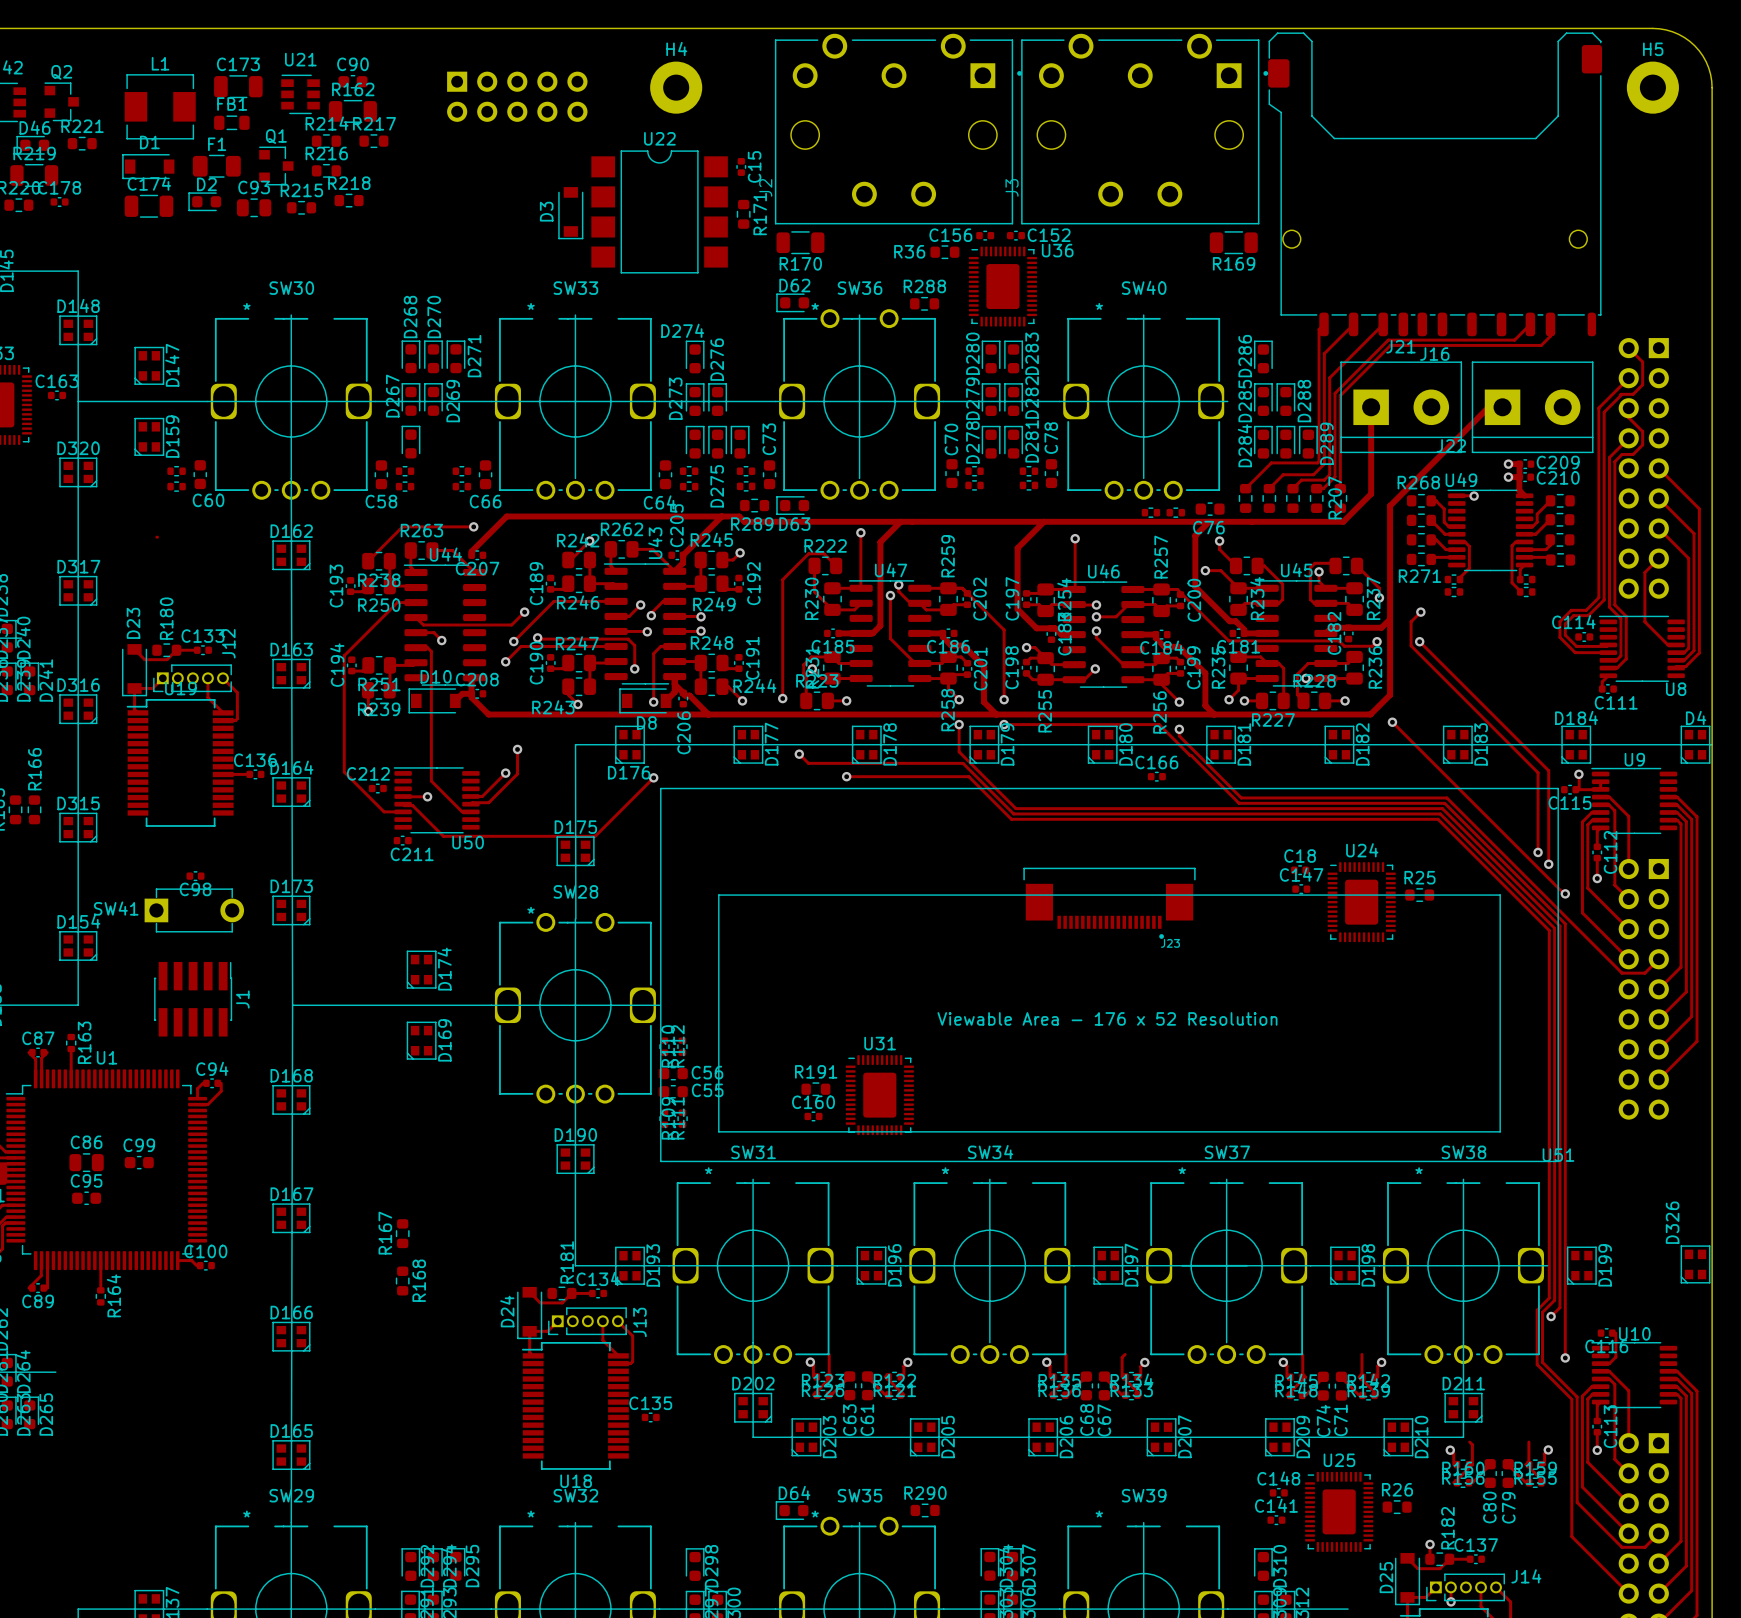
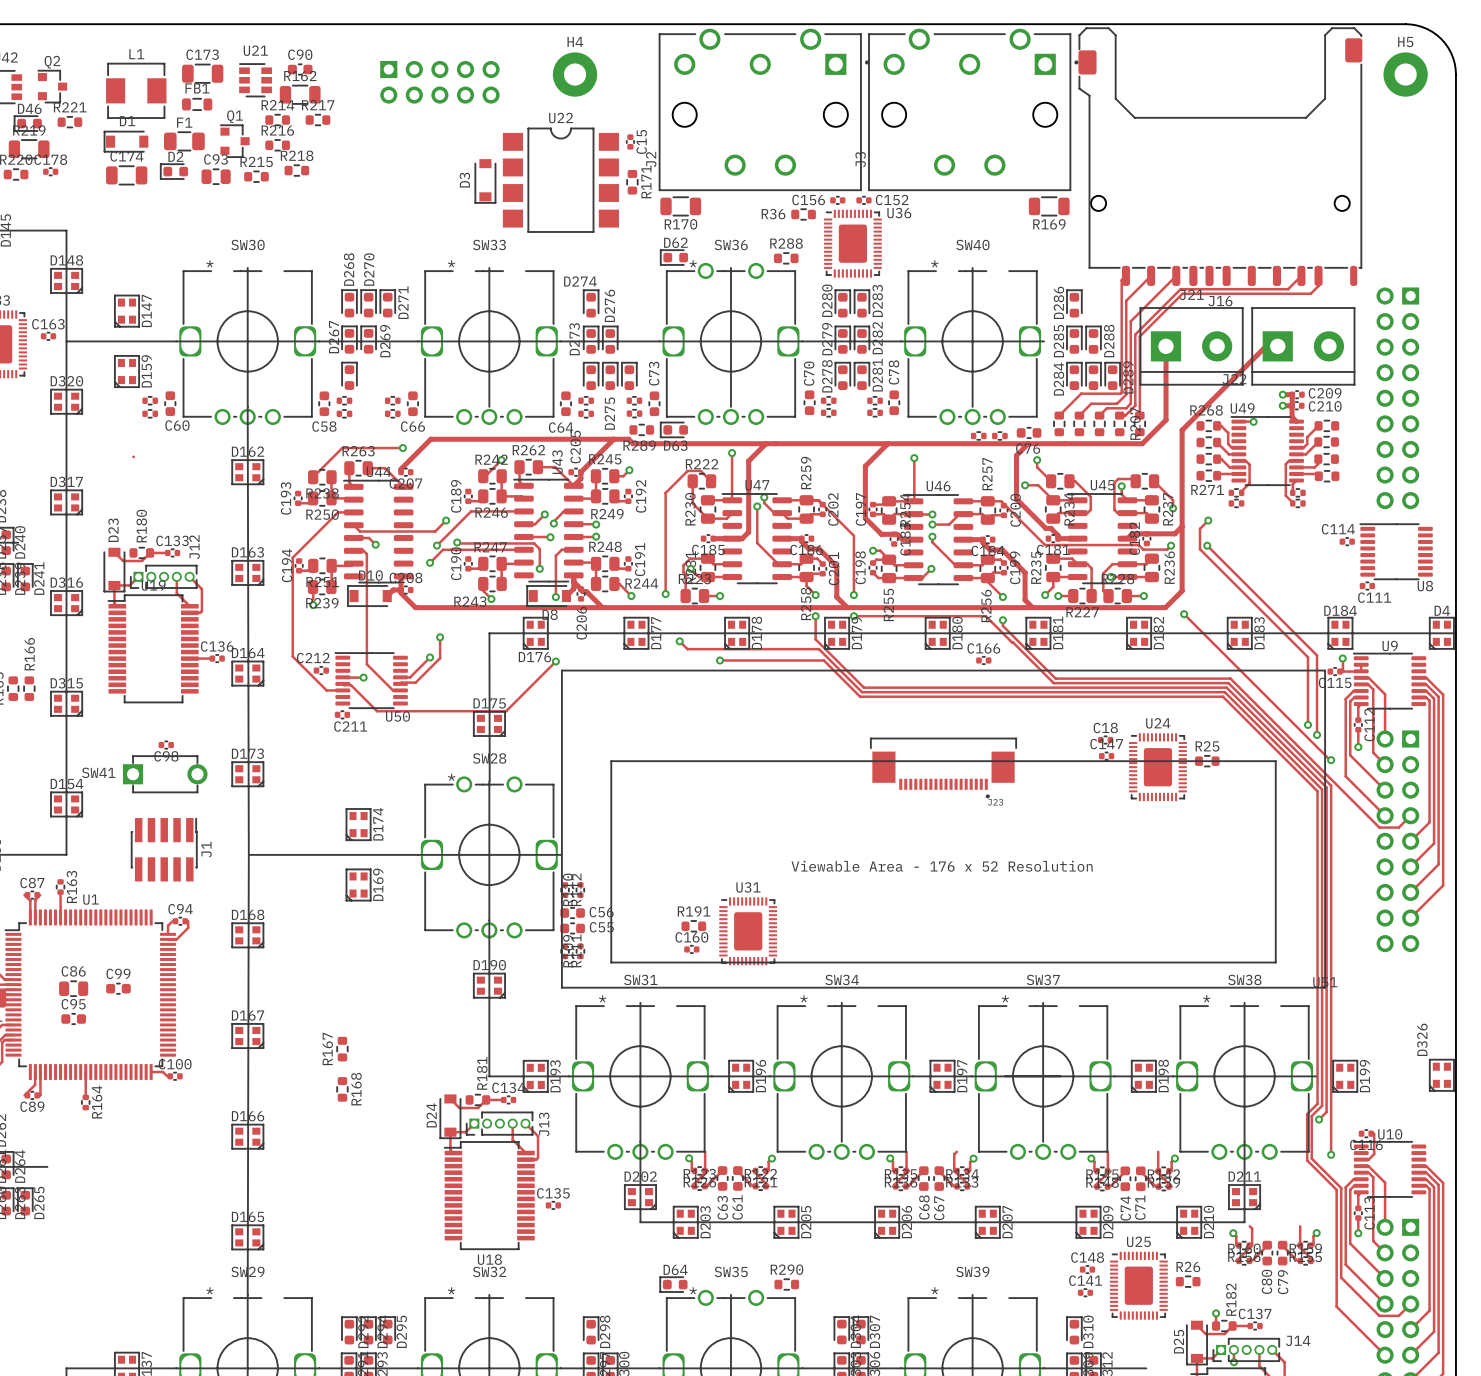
track: (1628, 348) (1642, 362) (1642, 384) (1633, 394) (1620, 394) (1604, 412) (1604, 599) (1588, 615) (1573, 615) (1565, 623) (1565, 635) (1576, 646) (1608, 644) -> none
track: (1628, 378) (1598, 408) (1598, 597) (1586, 610) (1571, 610) (1559, 621) (1559, 637) (1575, 652) (1608, 652) -> none
track: (1628, 408) (1628, 417) (1642, 431) (1642, 444) (1633, 454) (1622, 454) (1614, 461) (1614, 604) (1626, 616) (1626, 658) (1617, 668) (1608, 668) -> none
track: (1628, 438) (1609, 457) (1609, 607) (1620, 618) (1620, 655) (1616, 660) (1608, 660) -> none
track: (1658, 468) (1699, 508) (1699, 652) (1685, 666) (1676, 668) -> none
track: (1658, 498) (1694, 533) (1694, 650) (1684, 660) (1676, 660) -> none
track: (1658, 528) (1688, 558) (1688, 648) (1684, 652) (1676, 652) -> none
track: (1658, 558) (1644, 572) (1644, 621) (1667, 644) (1676, 644) -> none
track: (1608, 675) (1602, 681) (1602, 689) -> none

